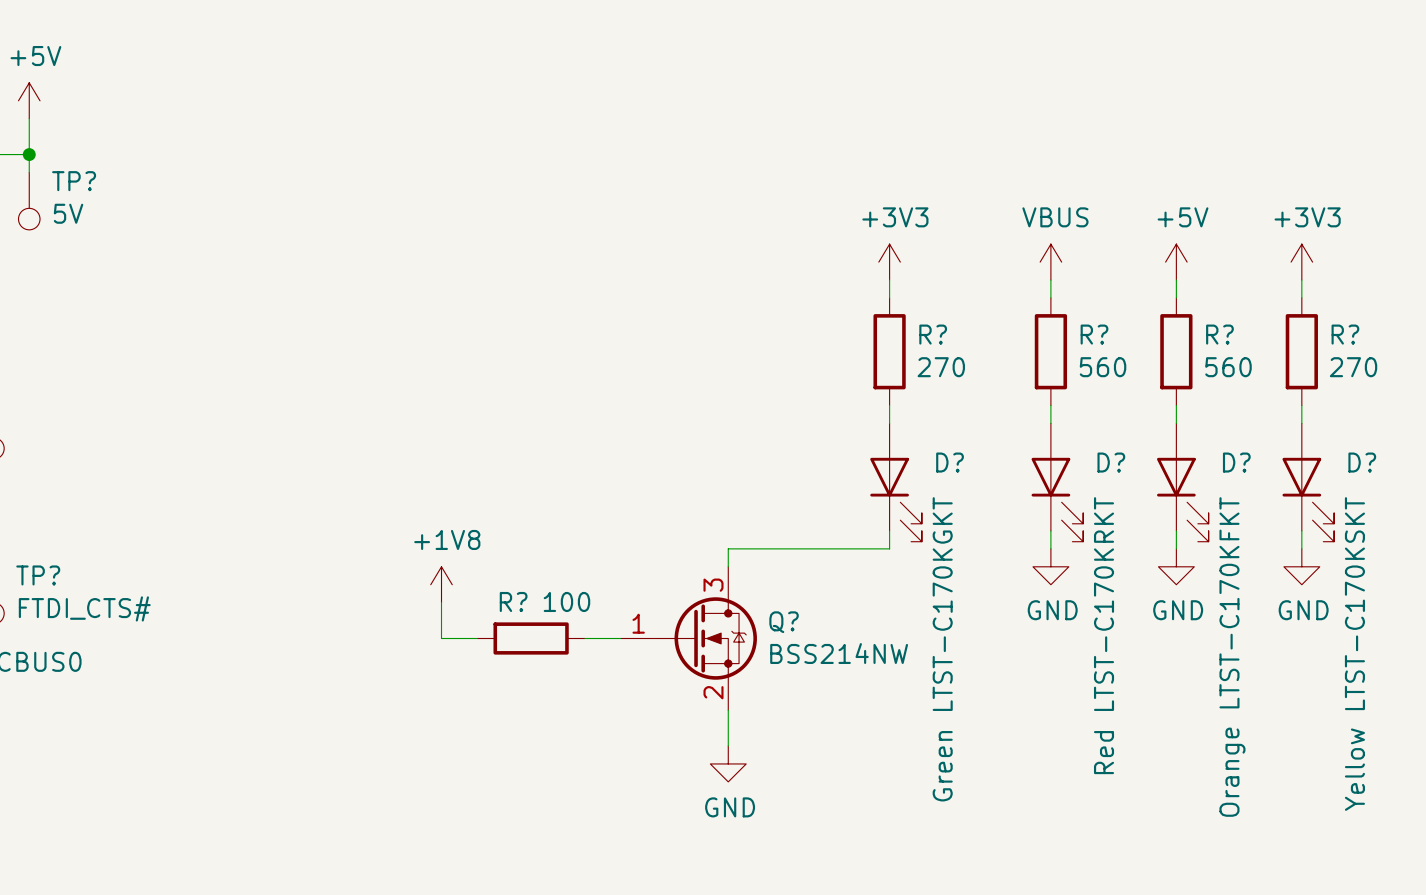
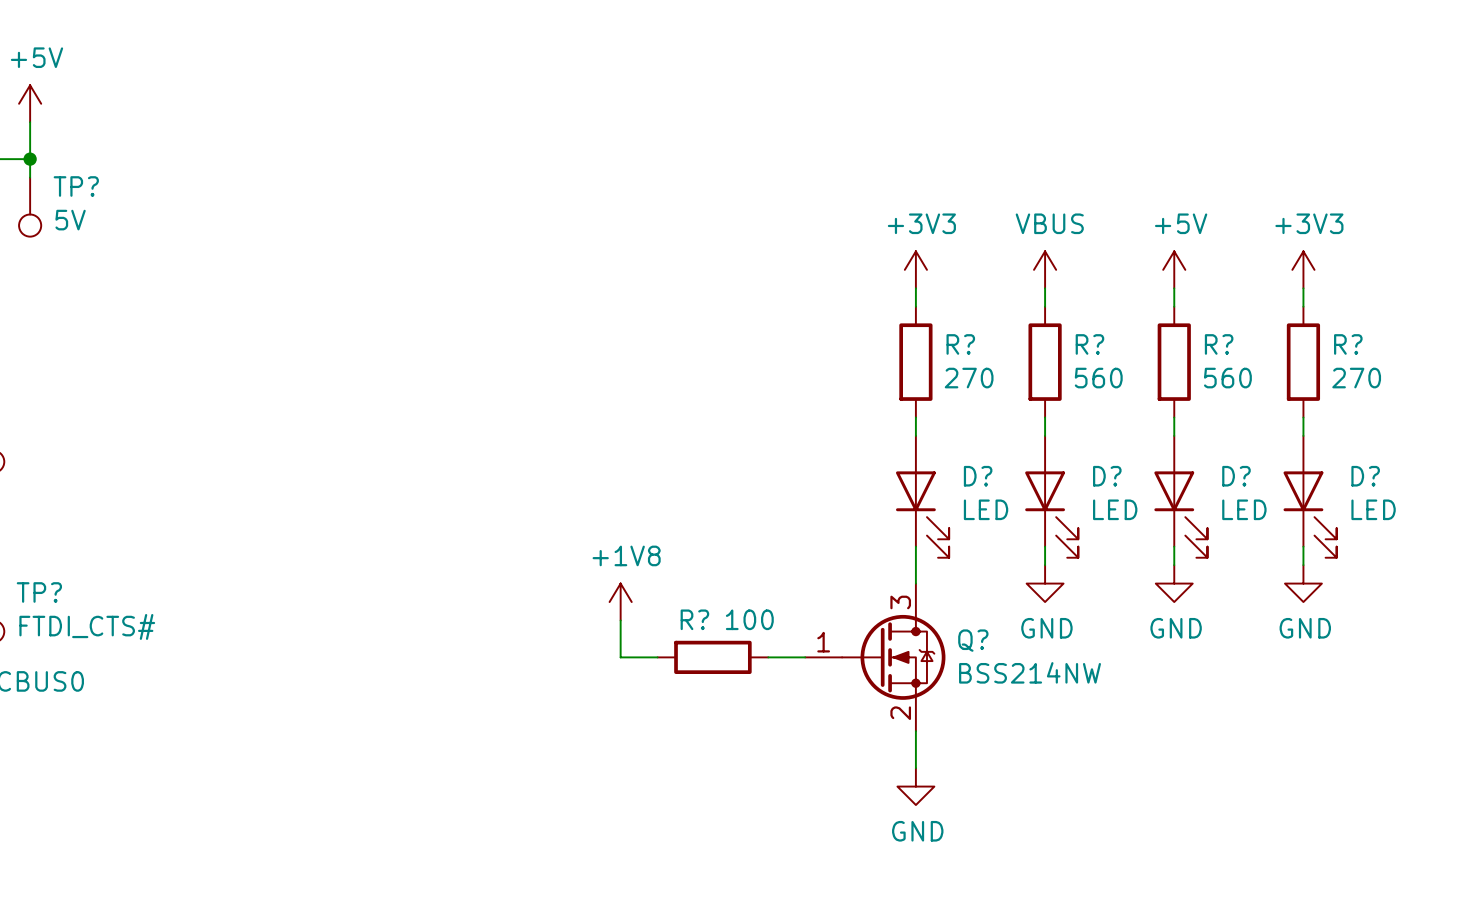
power symbol position: VBUS (1050, 262) -> VBUS (1045, 269)
power symbol position: +5V (1176, 262) -> +5V (1174, 269)
power symbol position: +3V3 (1301, 262) -> +3V3 (1303, 269)
wire: (1050, 280) (1050, 297) -> (1045, 288) (1045, 306)
wire: (1176, 280) (1176, 297) -> (1174, 288) (1174, 306)
wire: (1301, 280) (1301, 297) -> (1303, 288) (1303, 306)
R? position: (1050, 351) -> (1045, 362)
R? position: (1176, 351) -> (1174, 362)
R? position: (1301, 351) -> (1303, 362)
wire: (1050, 405) (1050, 423) -> (1045, 417) (1045, 435)
wire: (1176, 405) (1176, 423) -> (1174, 417) (1174, 435)
wire: (1301, 405) (1301, 423) -> (1303, 417) (1303, 435)
D?: none -> LED (1051, 496)
D?: Red LTST-C170KRKT (1057, 482) -> none
D?: none -> LED (1180, 496)
D?: Orange LTST-C170KFKT (1182, 482) -> none
D?: none -> LED (1310, 496)
D?: Yellow LTST-C170KSKT (1308, 482) -> none
wire: (1050, 530) (1050, 548) -> (1045, 546) (1045, 565)
wire: (1176, 530) (1176, 548) -> (1174, 546) (1174, 565)
wire: (1301, 530) (1301, 548) -> (1303, 546) (1303, 565)
wire: (889, 548) (728, 548) (728, 566) -> (915, 565) (915, 583)
power symbol position: GND (1050, 566) -> GND (1045, 583)
power symbol position: GND (1176, 566) -> GND (1174, 583)
power symbol position: GND (1301, 566) -> GND (1303, 583)
power symbol position: +1V8 (441, 584) -> +1V8 (620, 602)
wire: (441, 602) (441, 638) (477, 638) -> none
R? position: (531, 638) -> (712, 657)
wire: (584, 638) (602, 638) -> (620, 620) (620, 657)
Q? position: (688, 638) -> (875, 657)
wire: none -> (768, 657) (805, 657)
D? value: Green LTST-C170KGKT (942, 649) -> LED (986, 509)
wire: (728, 710) (728, 746) -> (915, 731) (915, 768)
power symbol: GND (728, 763) -> none
power symbol: none -> GND (915, 786)

